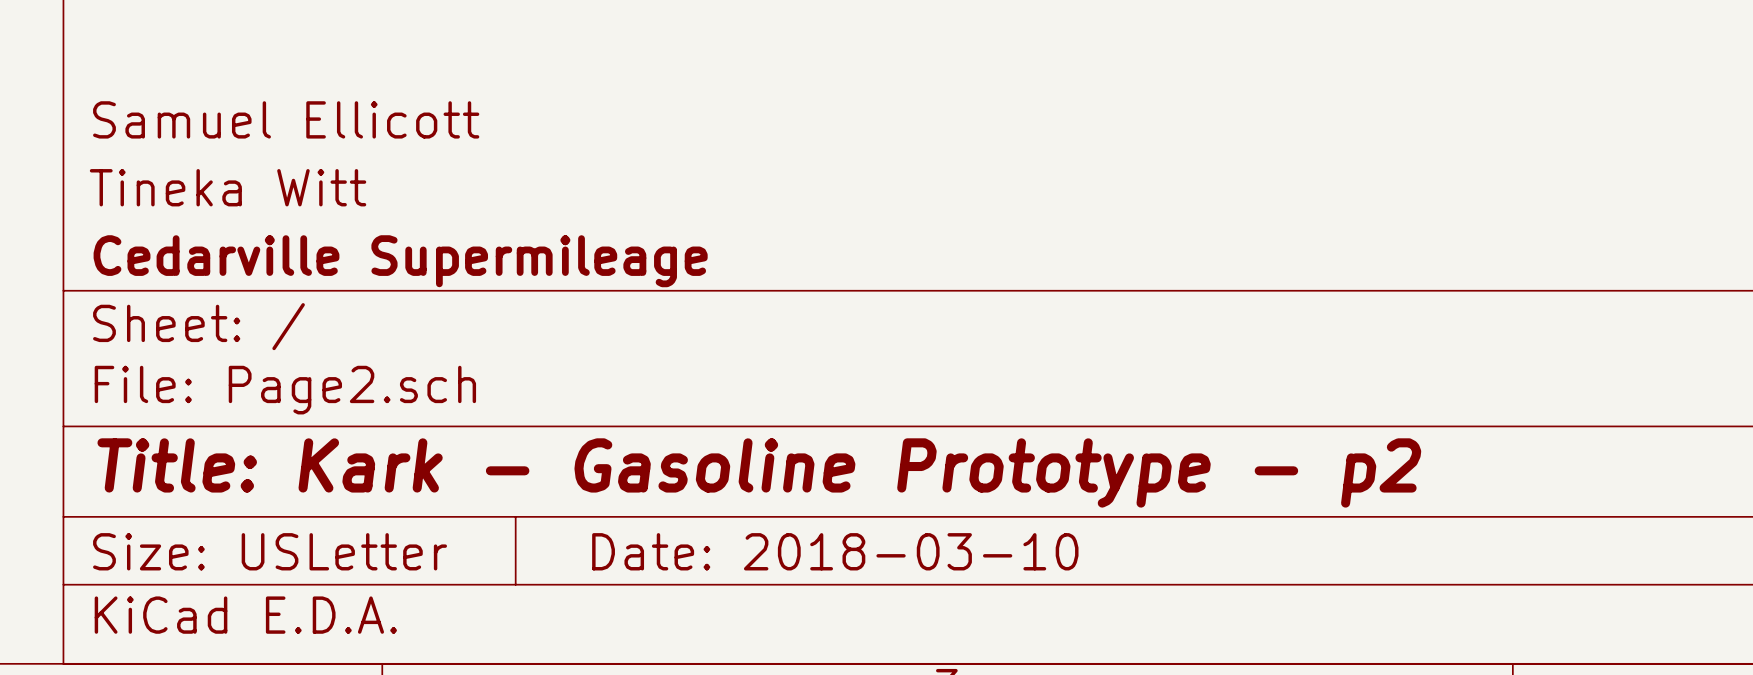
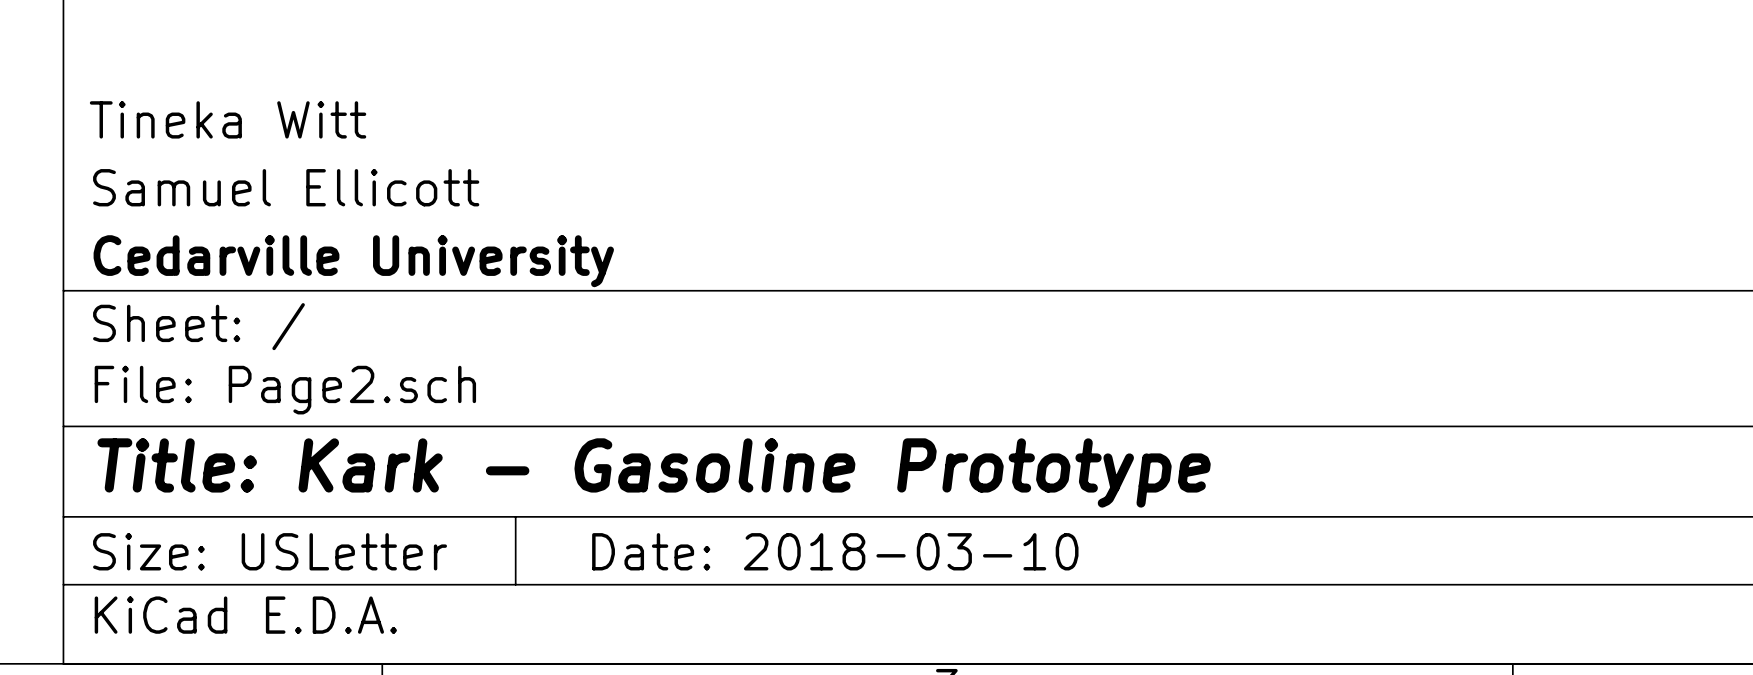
title block: Samuel Ellicott (286, 119) -> Tineka Witt (228, 119)
title block: Tineka Witt (228, 187) -> Samuel Ellicott (286, 187)
title block: Cedarville Supermileage (400, 261) -> Cedarville University (353, 261)
title block: Title: Kark - Gasoline Prototype - p2 (759, 472) -> Title: Kark - Gasoline Prototype (654, 472)

